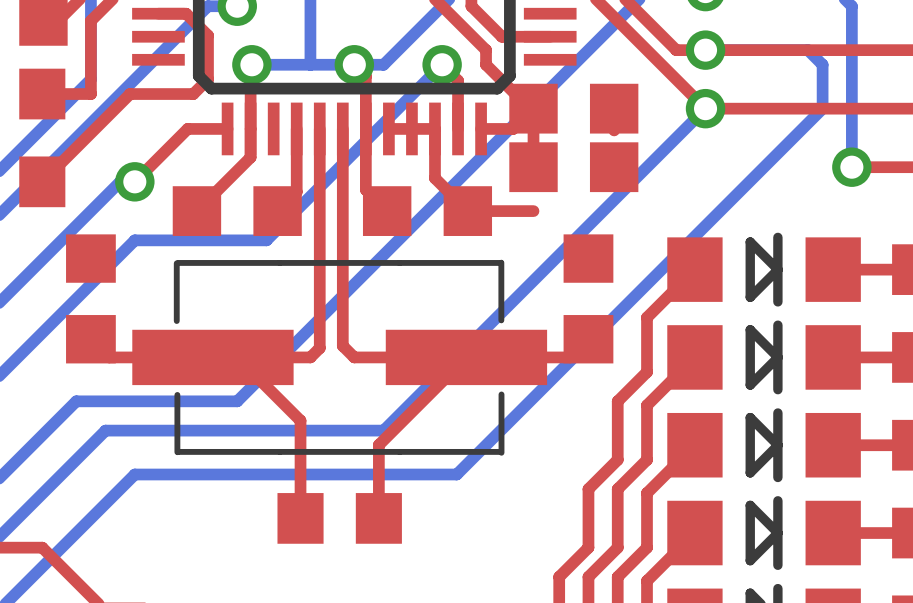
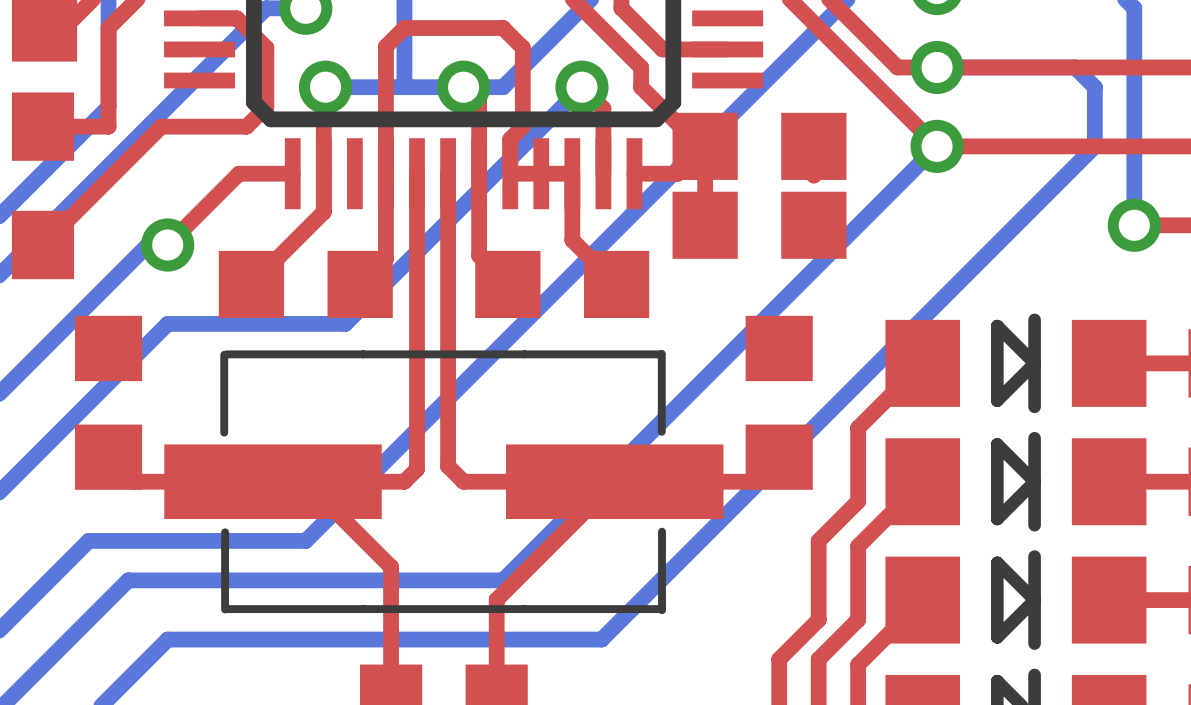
top track: none -> (385, 173) (385, 46) (404, 28) (503, 28) (522, 47) (522, 126) (510, 139) (510, 173)
top track: (467, 211) (533, 211) -> none

